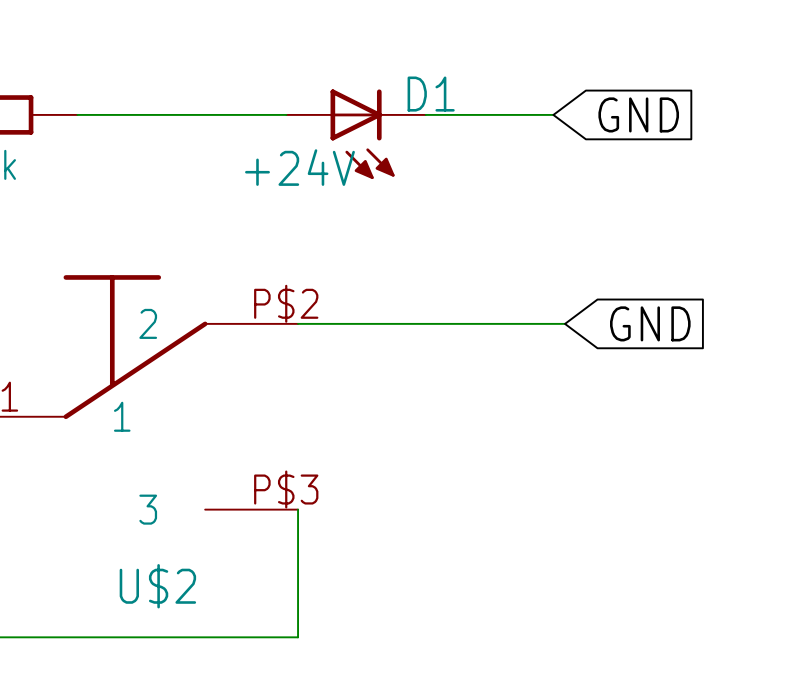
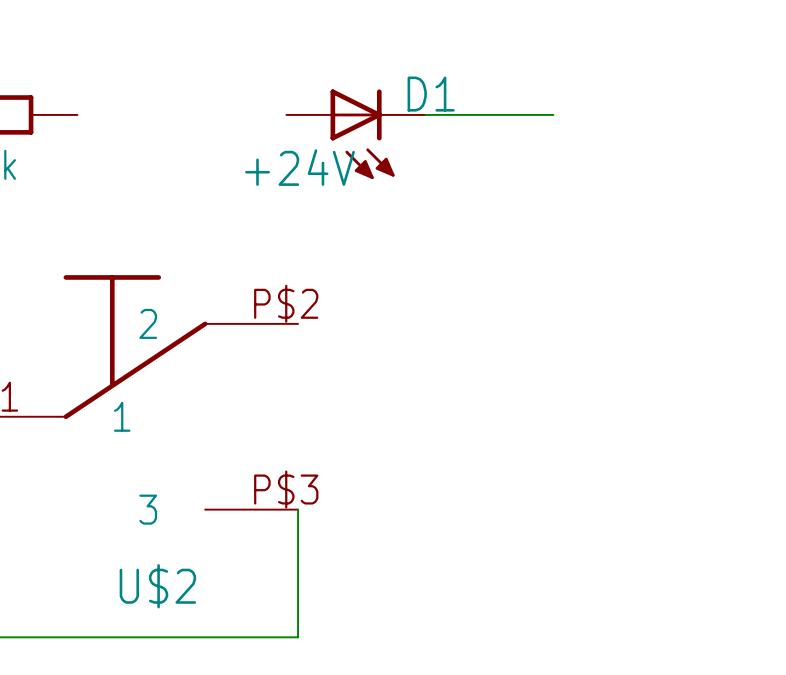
wire: (77, 114) (286, 114) -> none
global label: GND (638, 114) -> none
wire: (298, 323) (565, 323) -> none
global label: GND (650, 323) -> none

